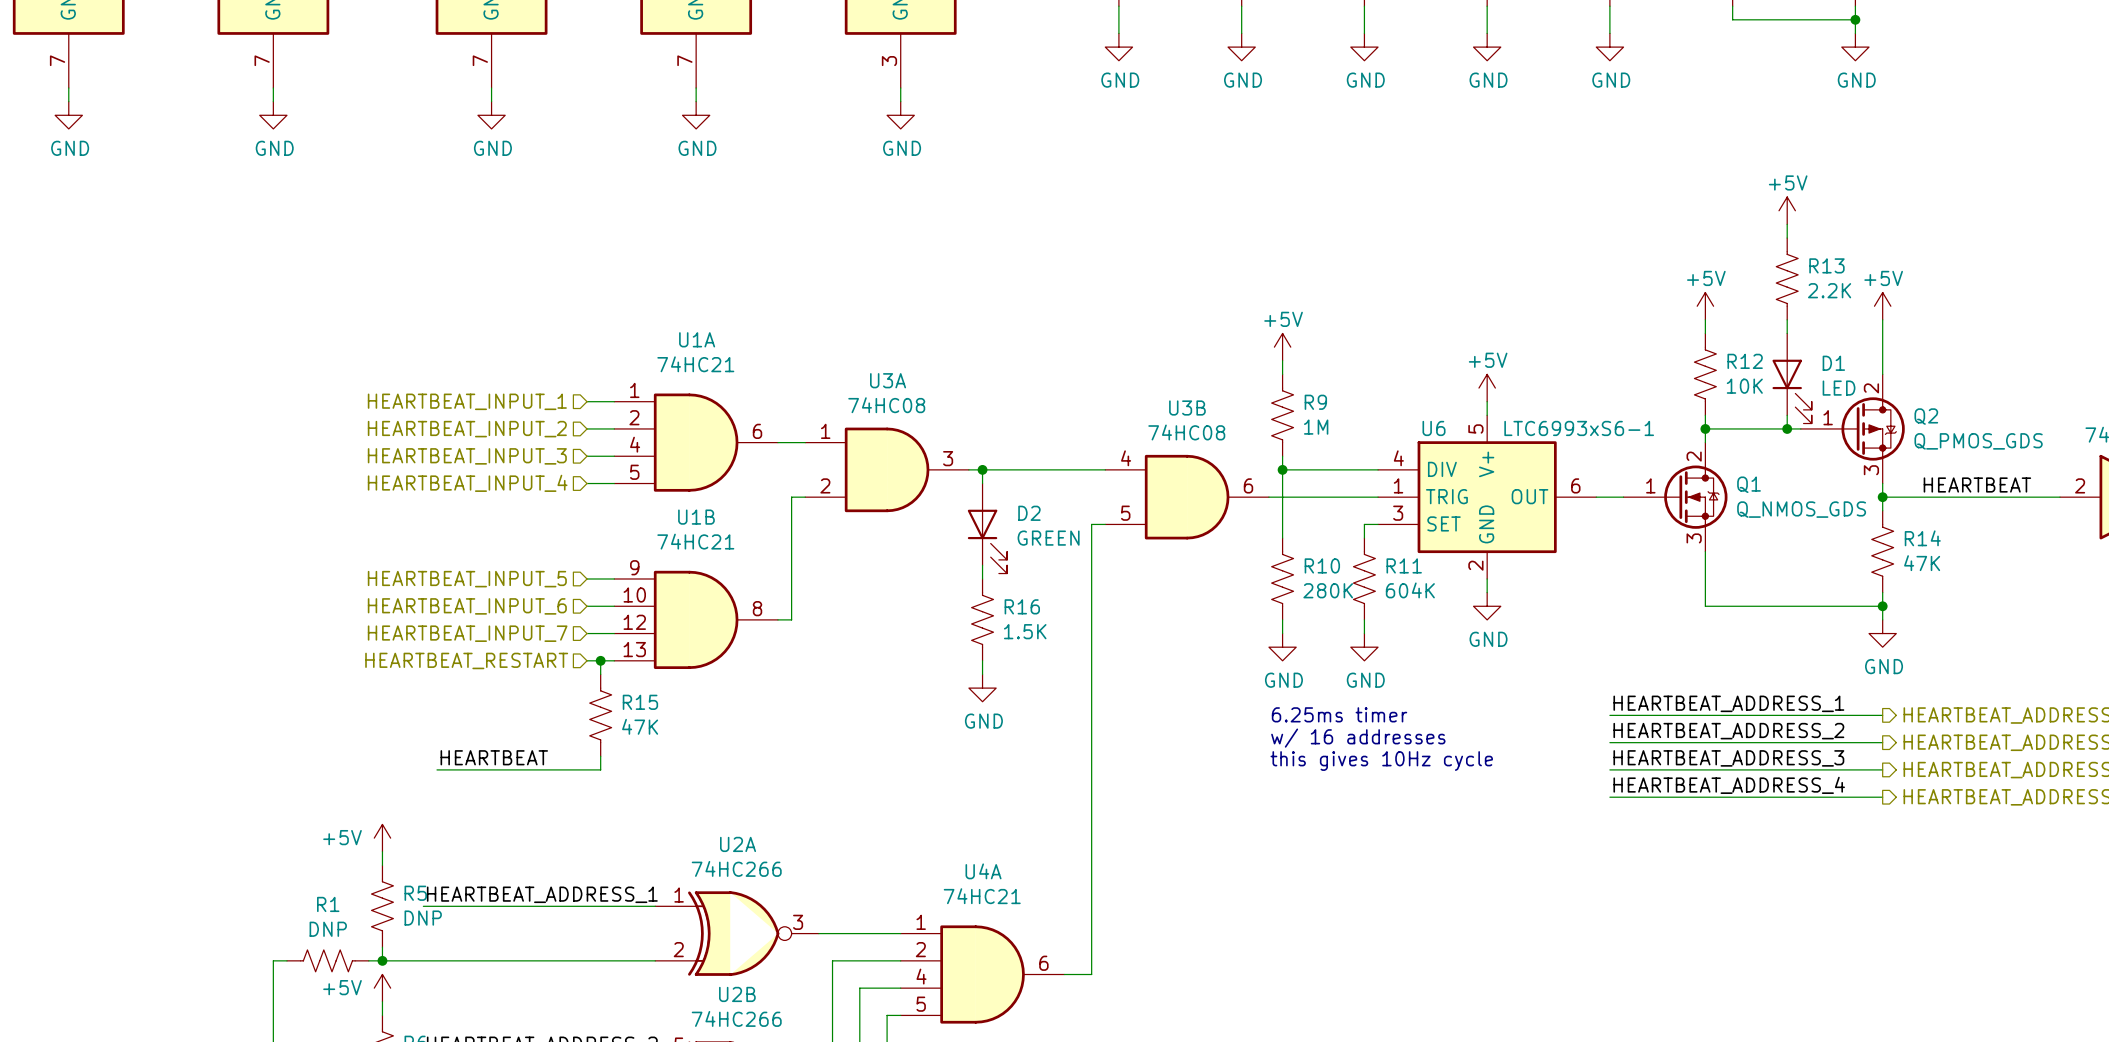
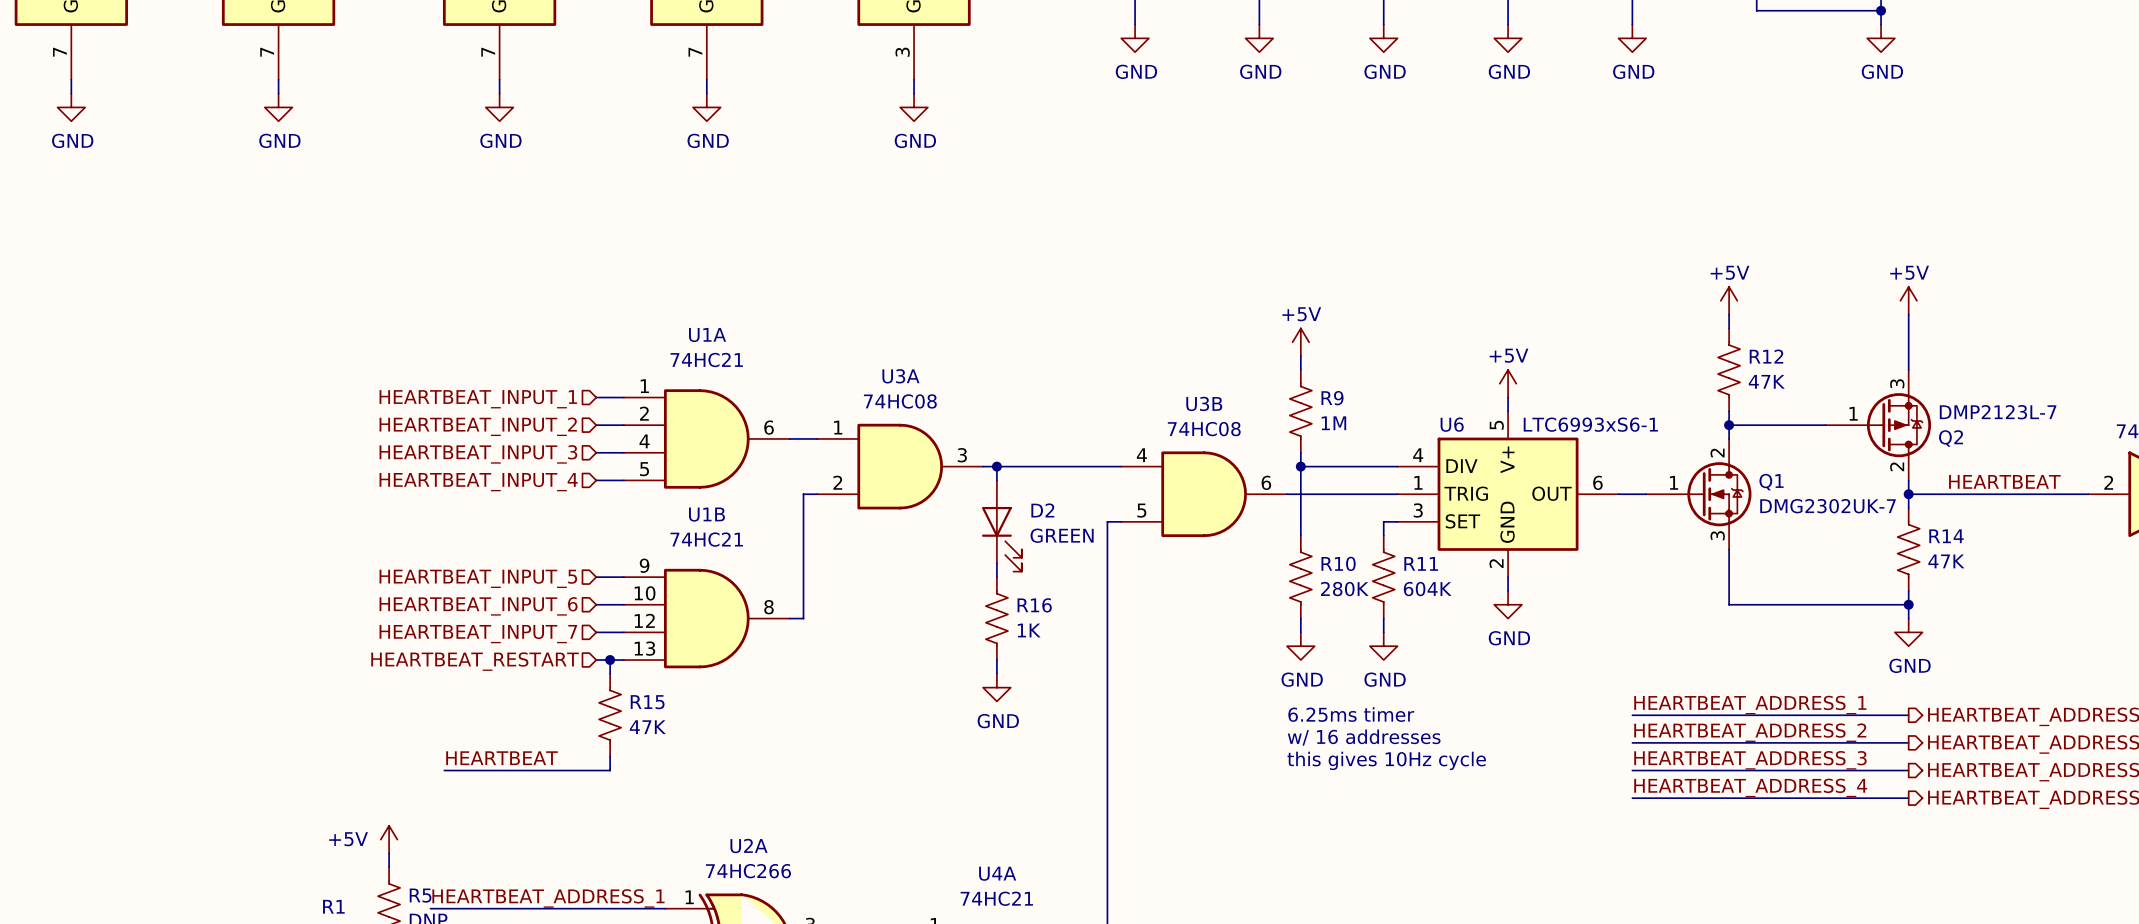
power symbol: +5V (1787, 210) -> none
wire: (1787, 224) (1787, 238) -> none
R13: 2.2K (1787, 278) -> none
wire: (1787, 319) (1787, 333) -> none
D1: LED (1792, 378) -> none
R12 value: 10K (1744, 386) -> 47K (1766, 381)
wire: (1787, 415) (1787, 428) -> none
junction: (1787, 428) -> none
Q2 flip: as is (1873, 428) -> up-down (1899, 425)
Q2 value: Q_PMOS_GDS (1978, 441) -> DMP2123L-7 (1998, 412)
Q1 value: Q_NMOS_GDS (1801, 509) -> DMG2302UK-7 (1828, 506)
R16 value: 1.5K (1025, 631) -> 1K (1029, 630)

